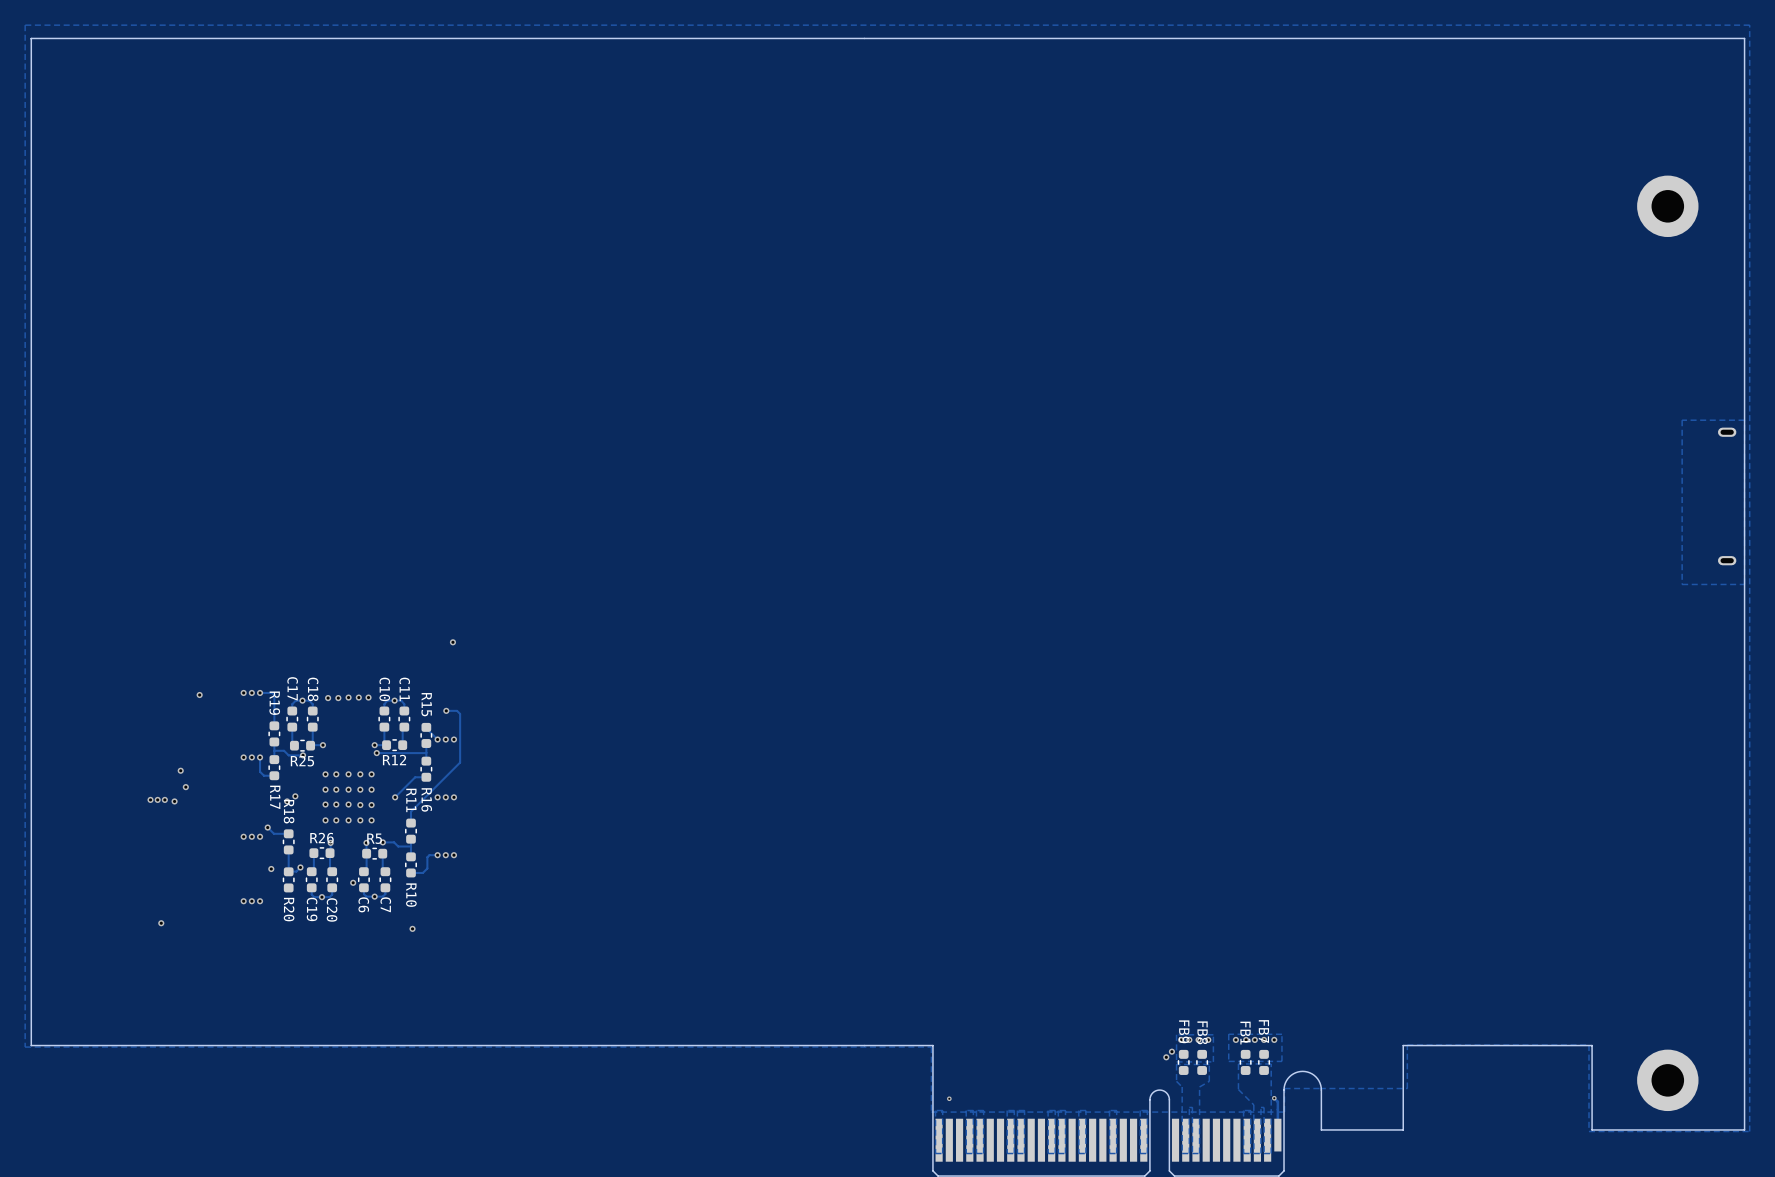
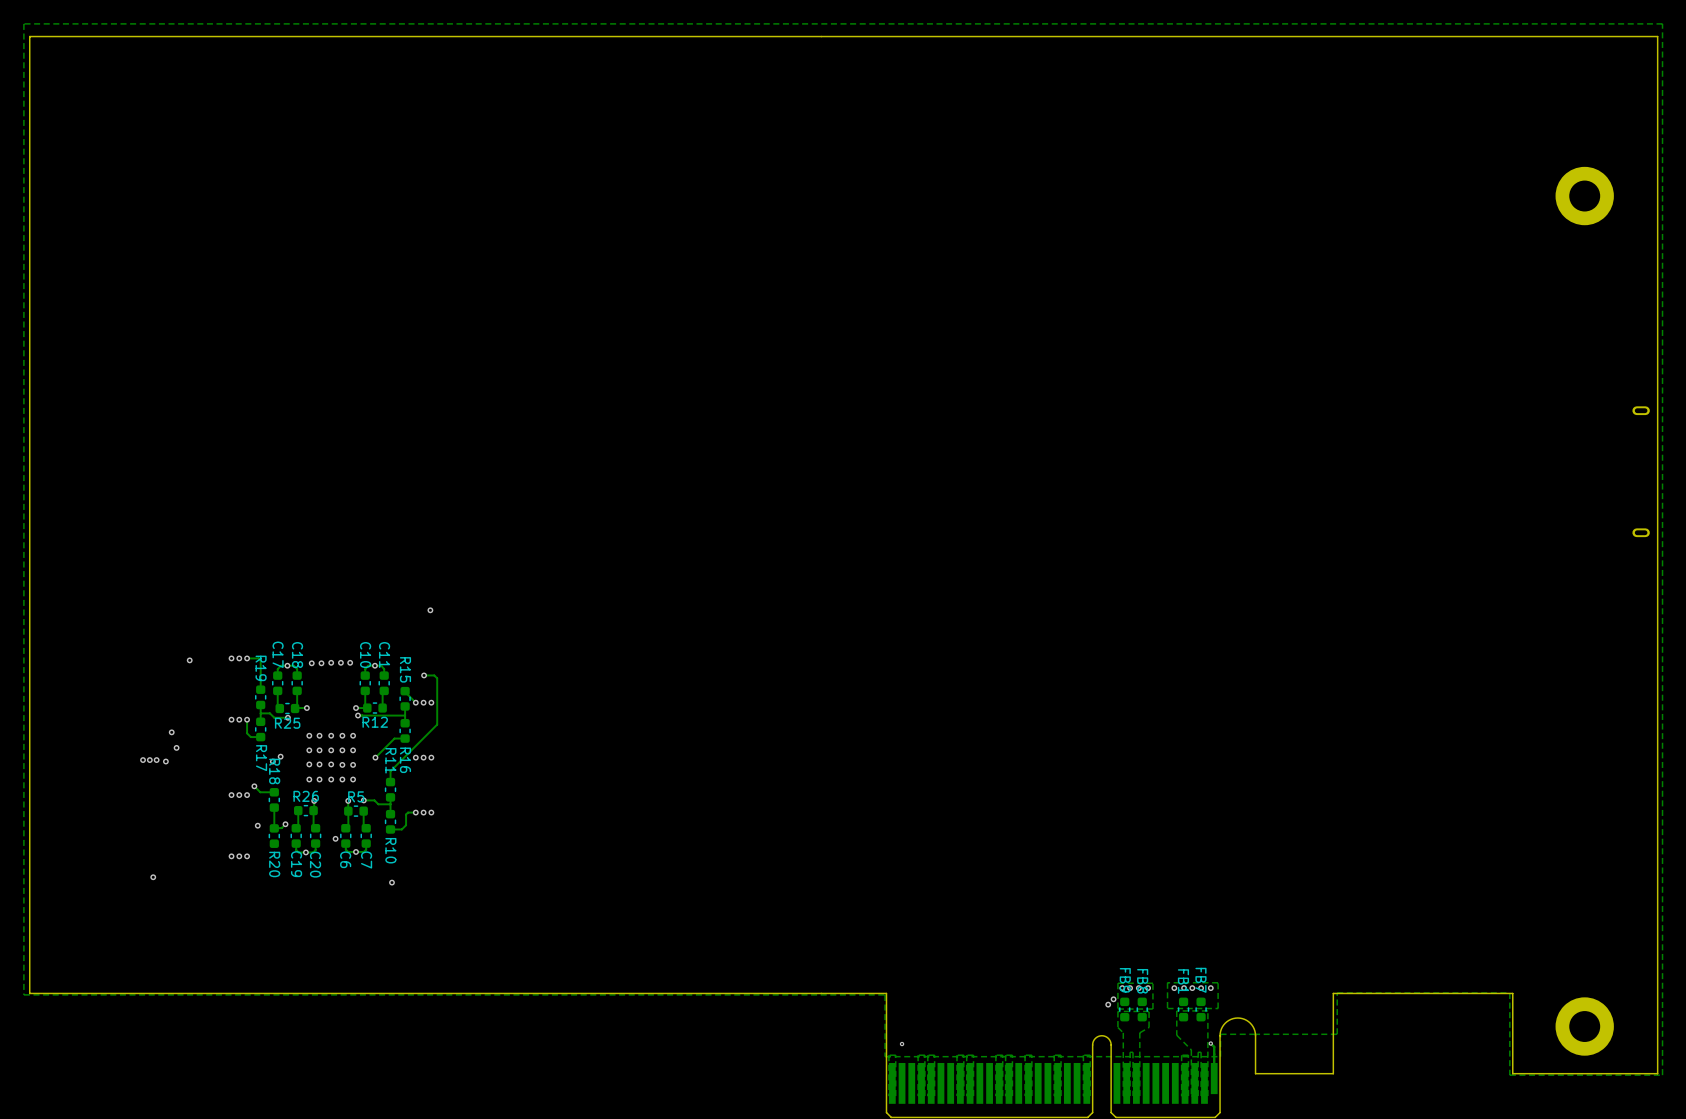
zone outline: (1744, 420) (1744, 584) (1682, 584) (1682, 420) (1744, 420) -> none

